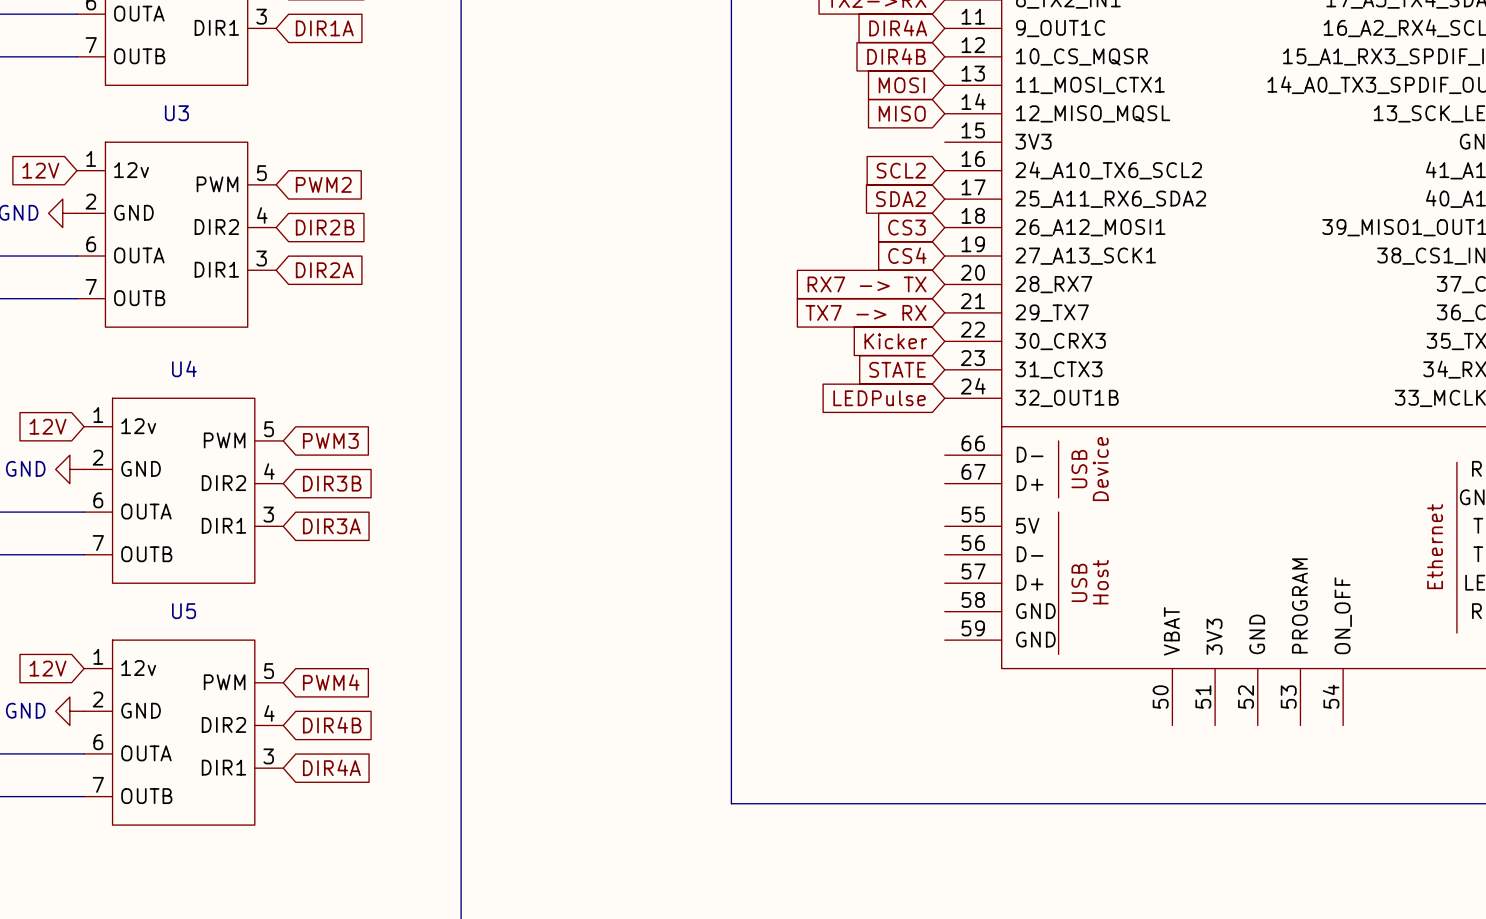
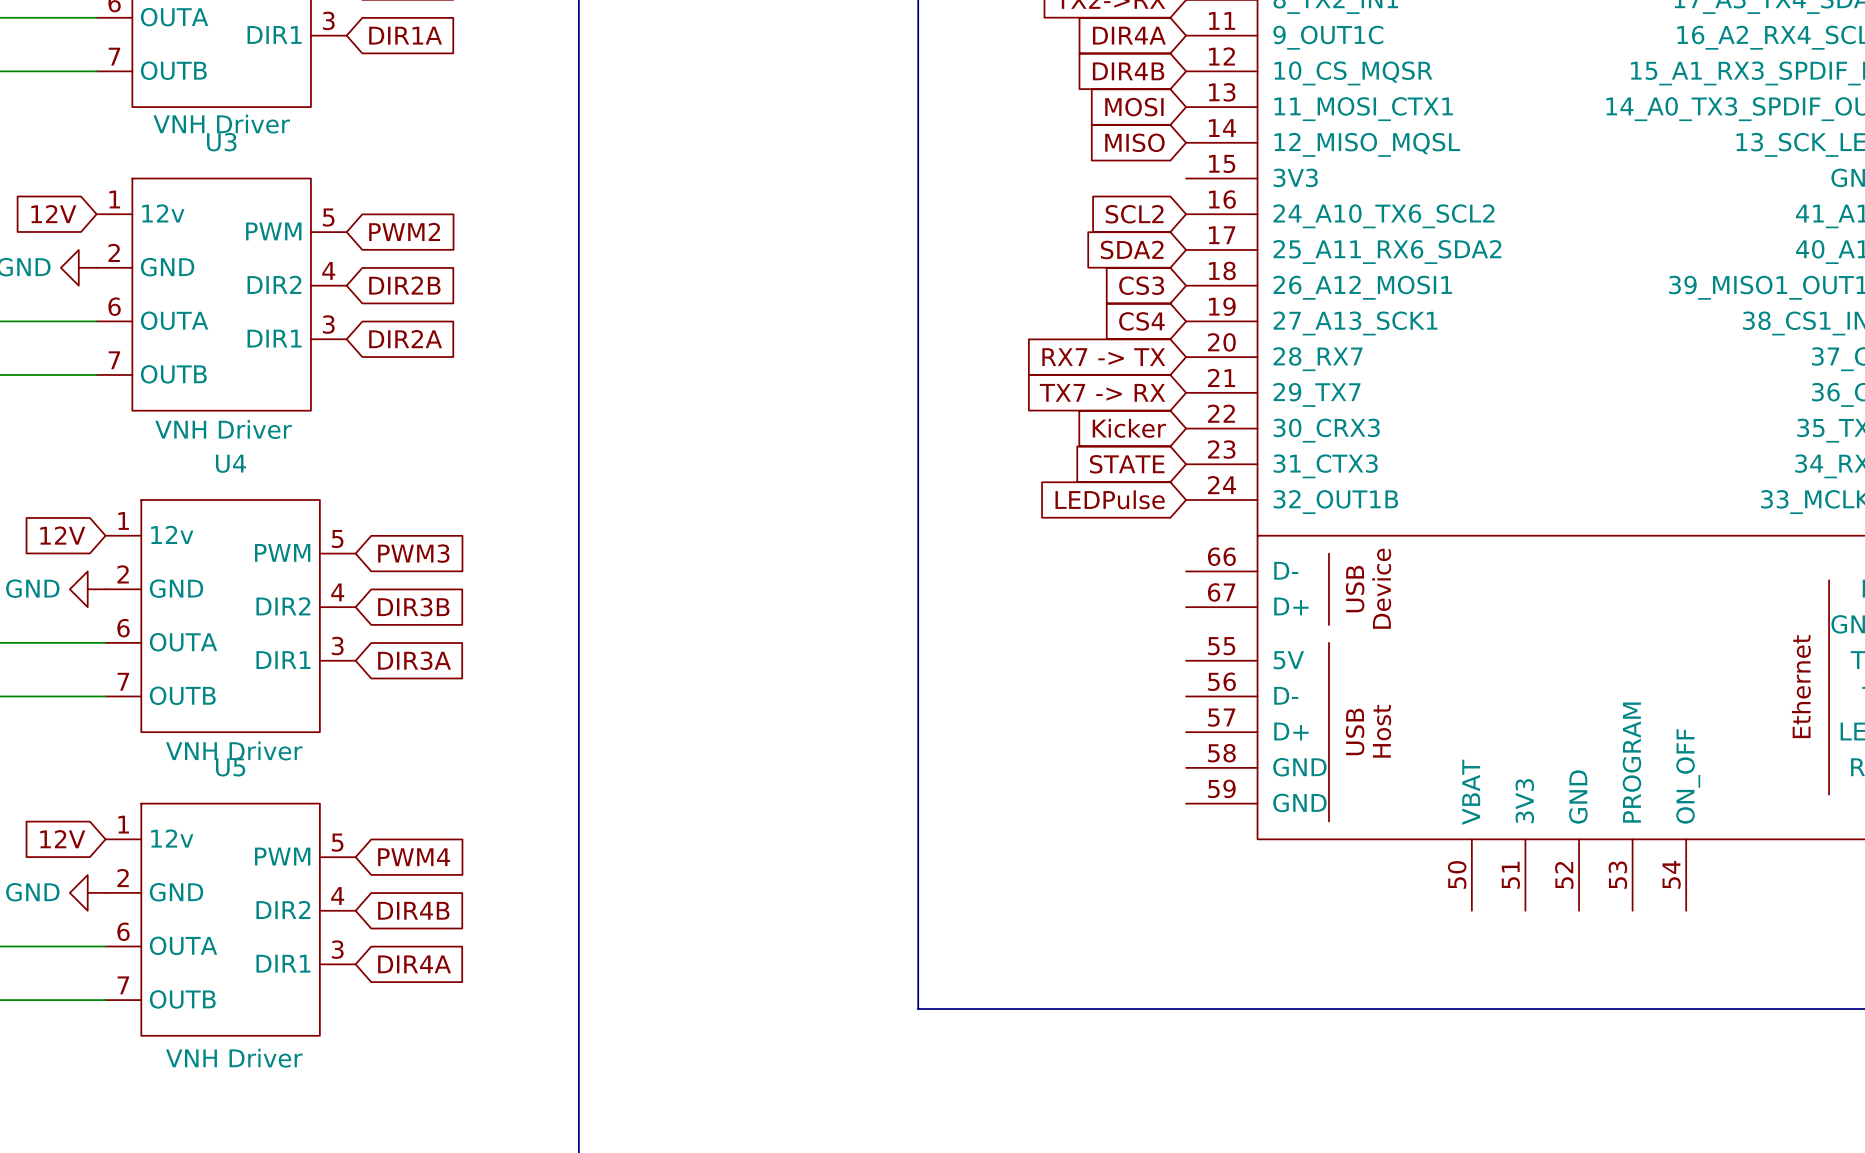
part value: none -> VNH Driver (221, 124)
U3 value: none -> VNH Driver (223, 429)
U4 value: none -> VNH Driver (234, 750)
U5 value: none -> VNH Driver (234, 1058)

